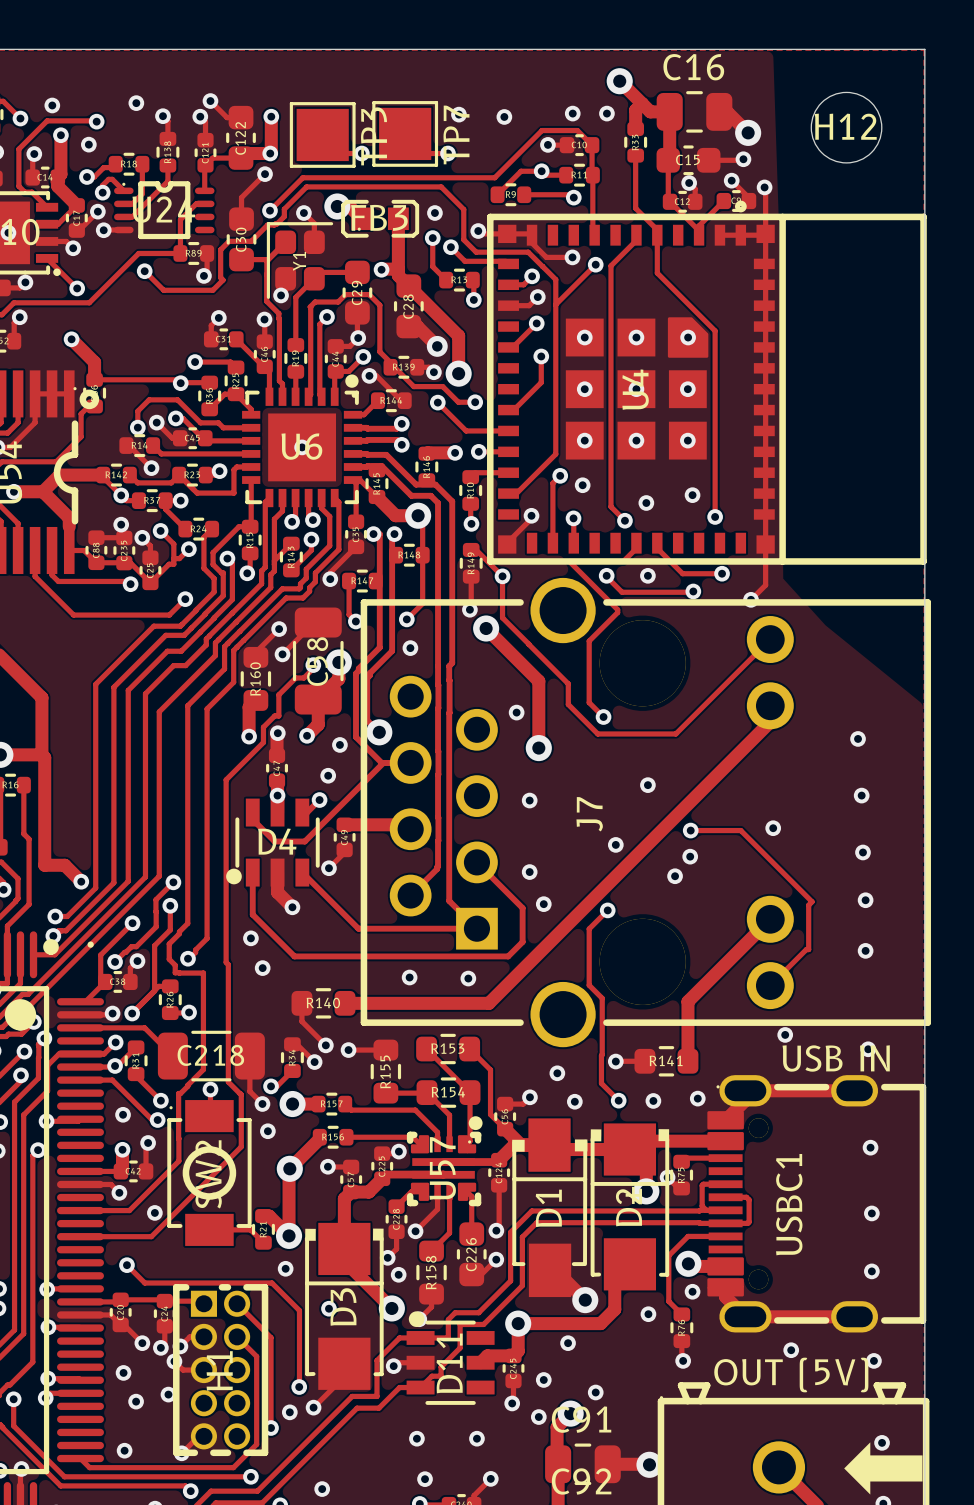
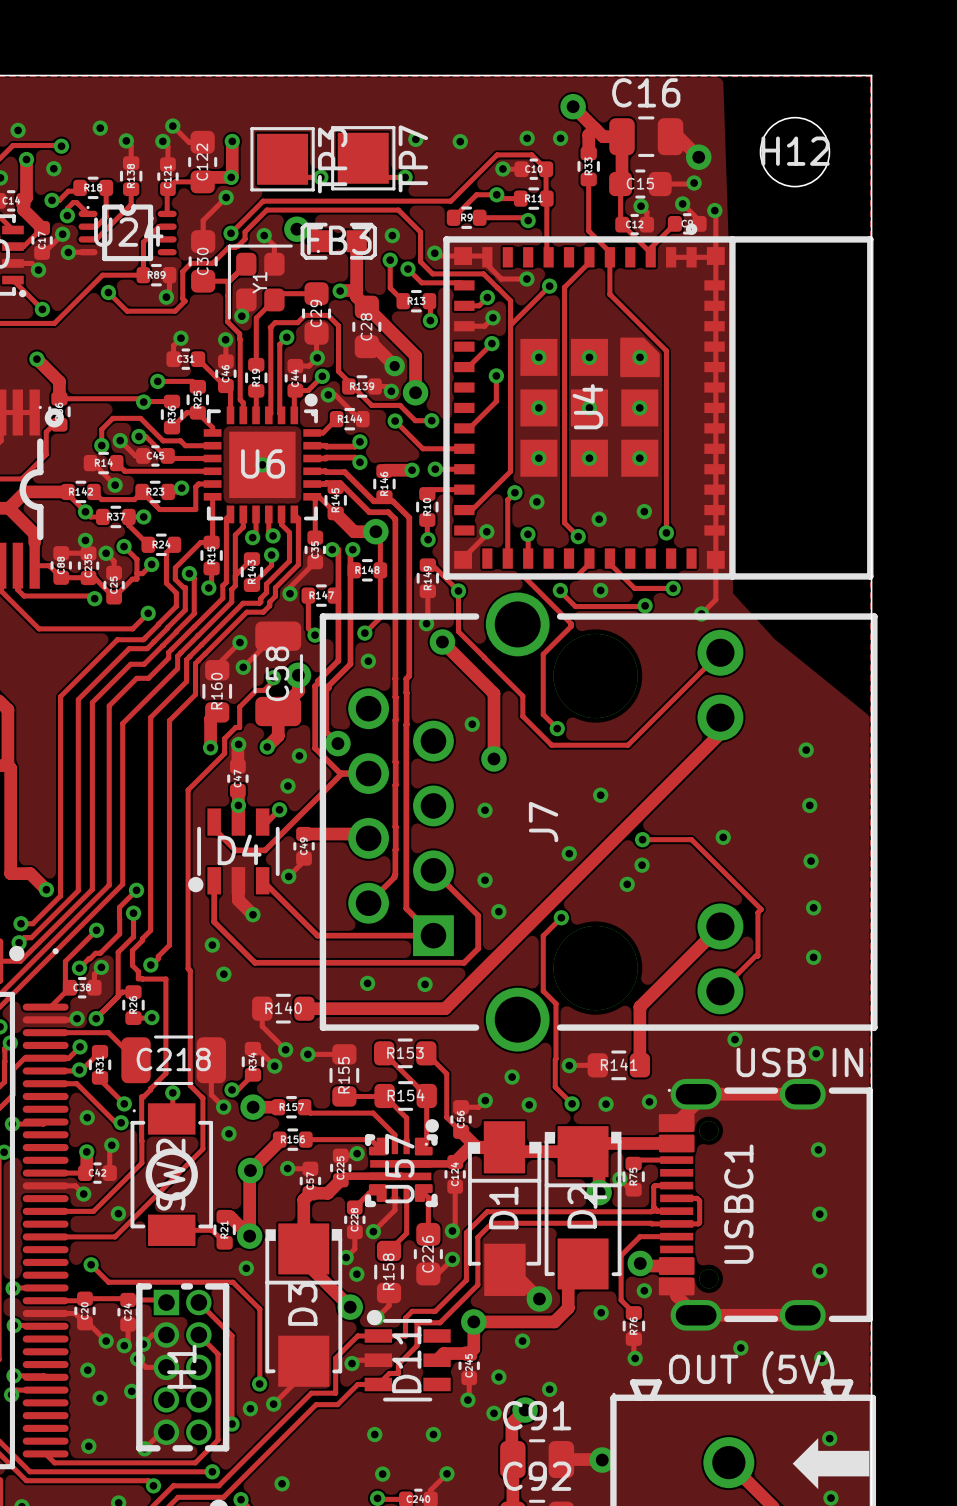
via: (328, 1308) -> none

